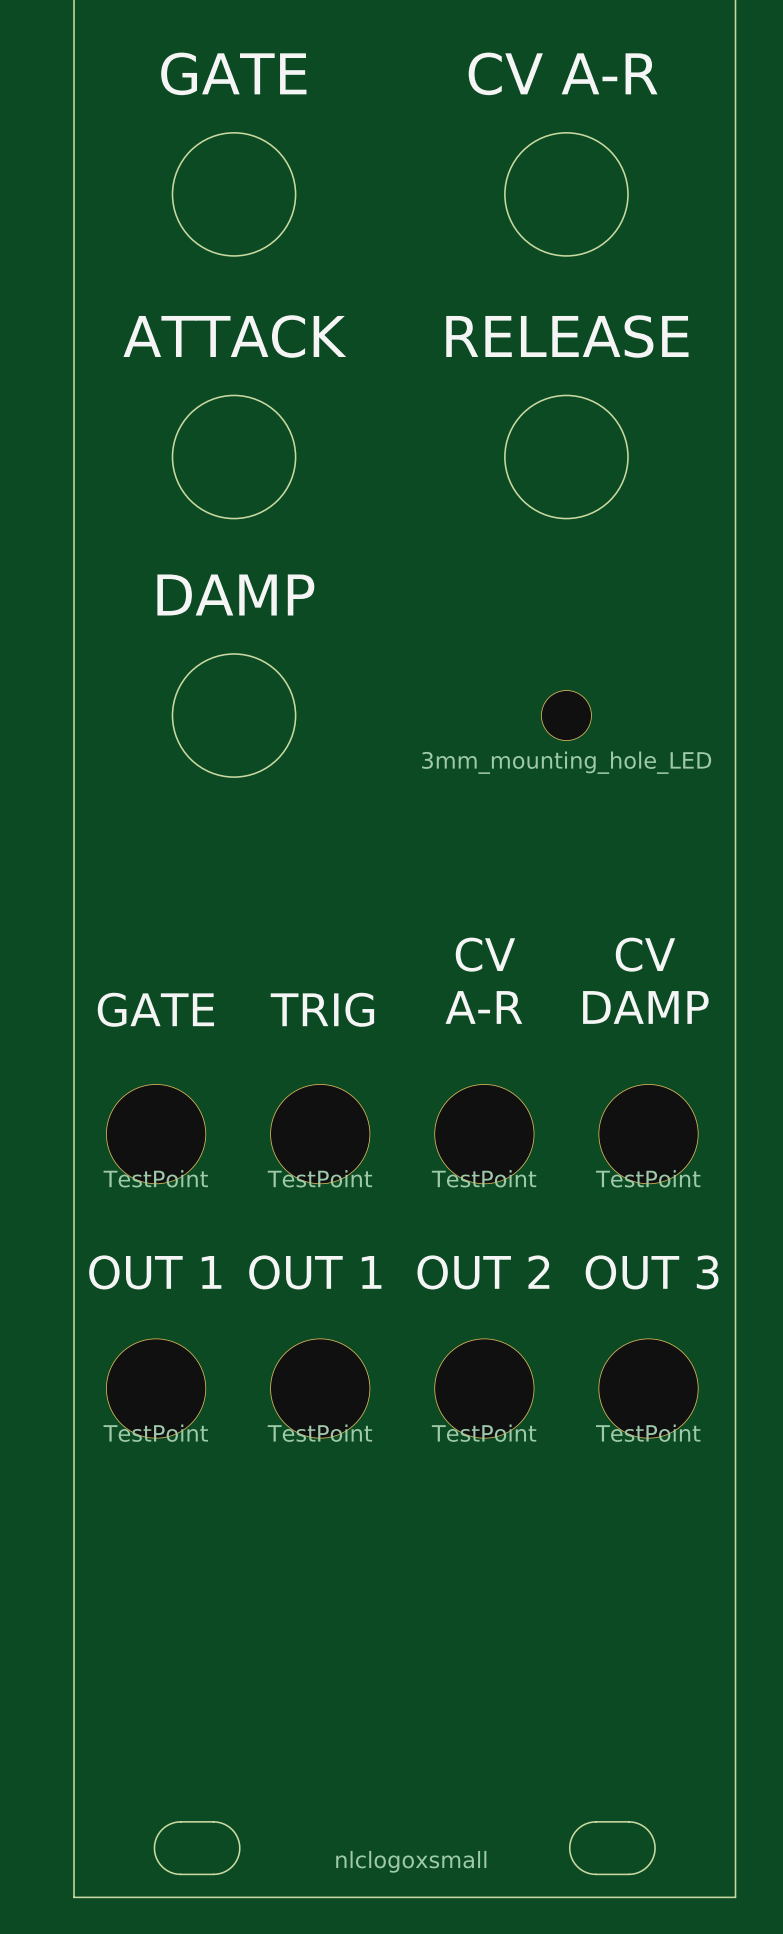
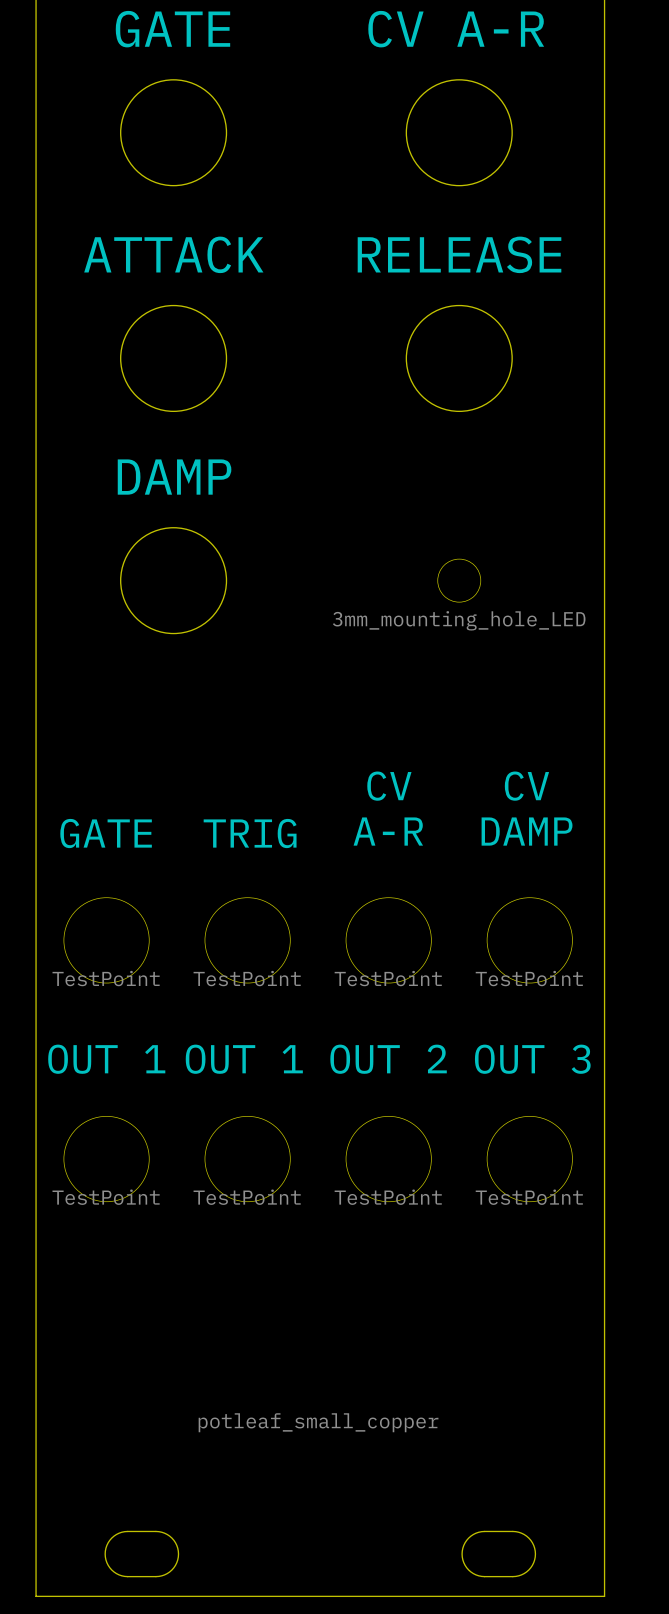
drawing: none -> [198, 1413, 439, 1433]
drawing: [336, 1850, 487, 1873] -> none

